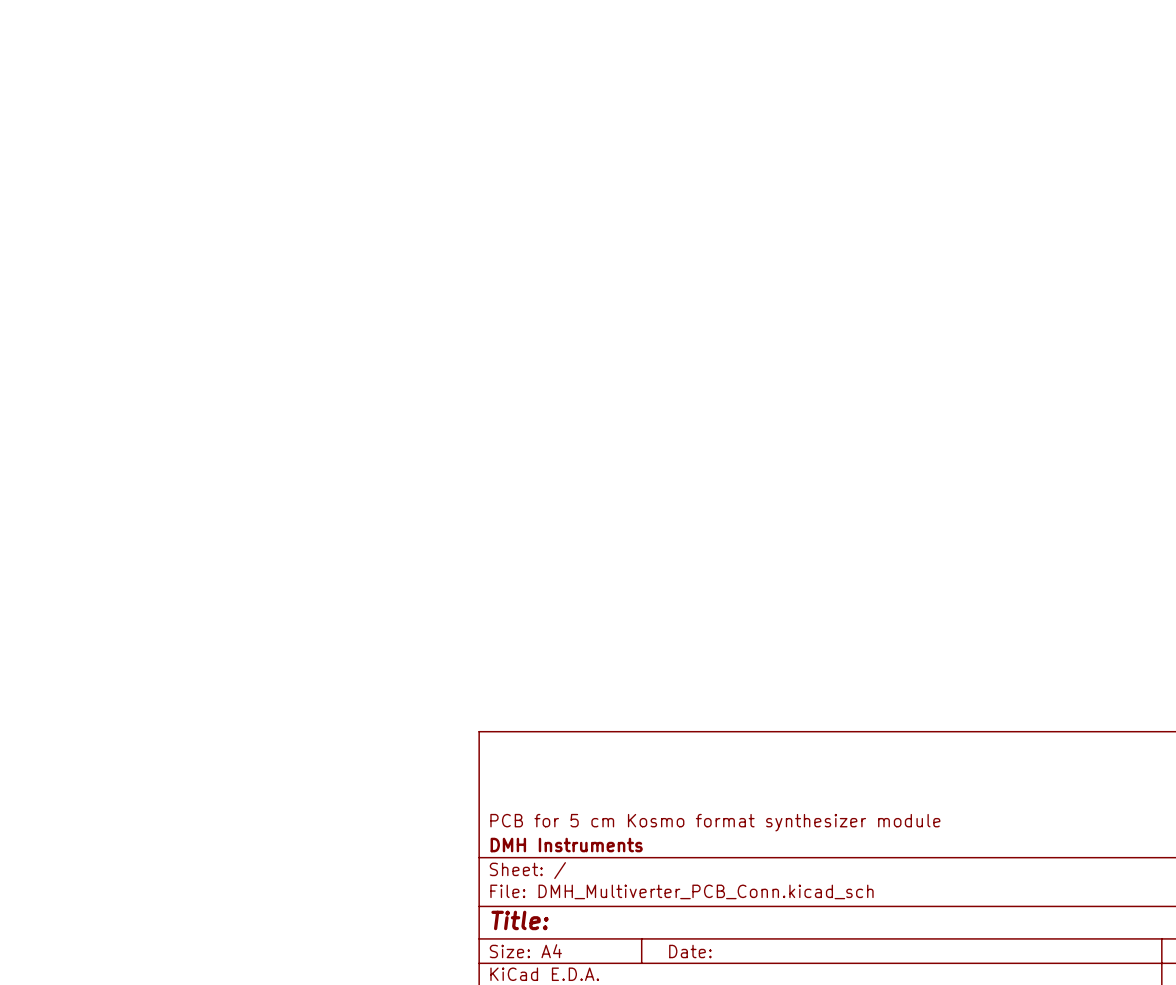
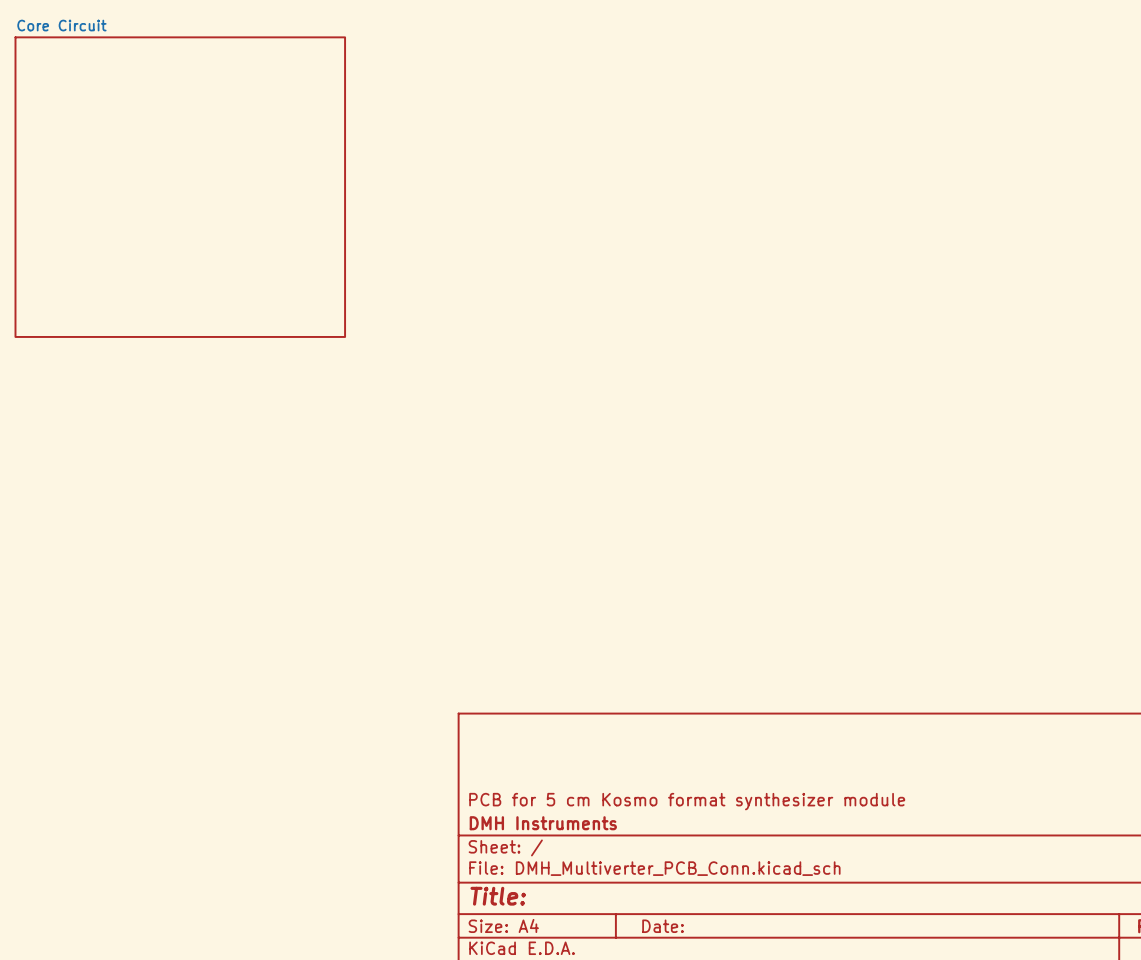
sheet Core Circuit: none -> (180, 187)

